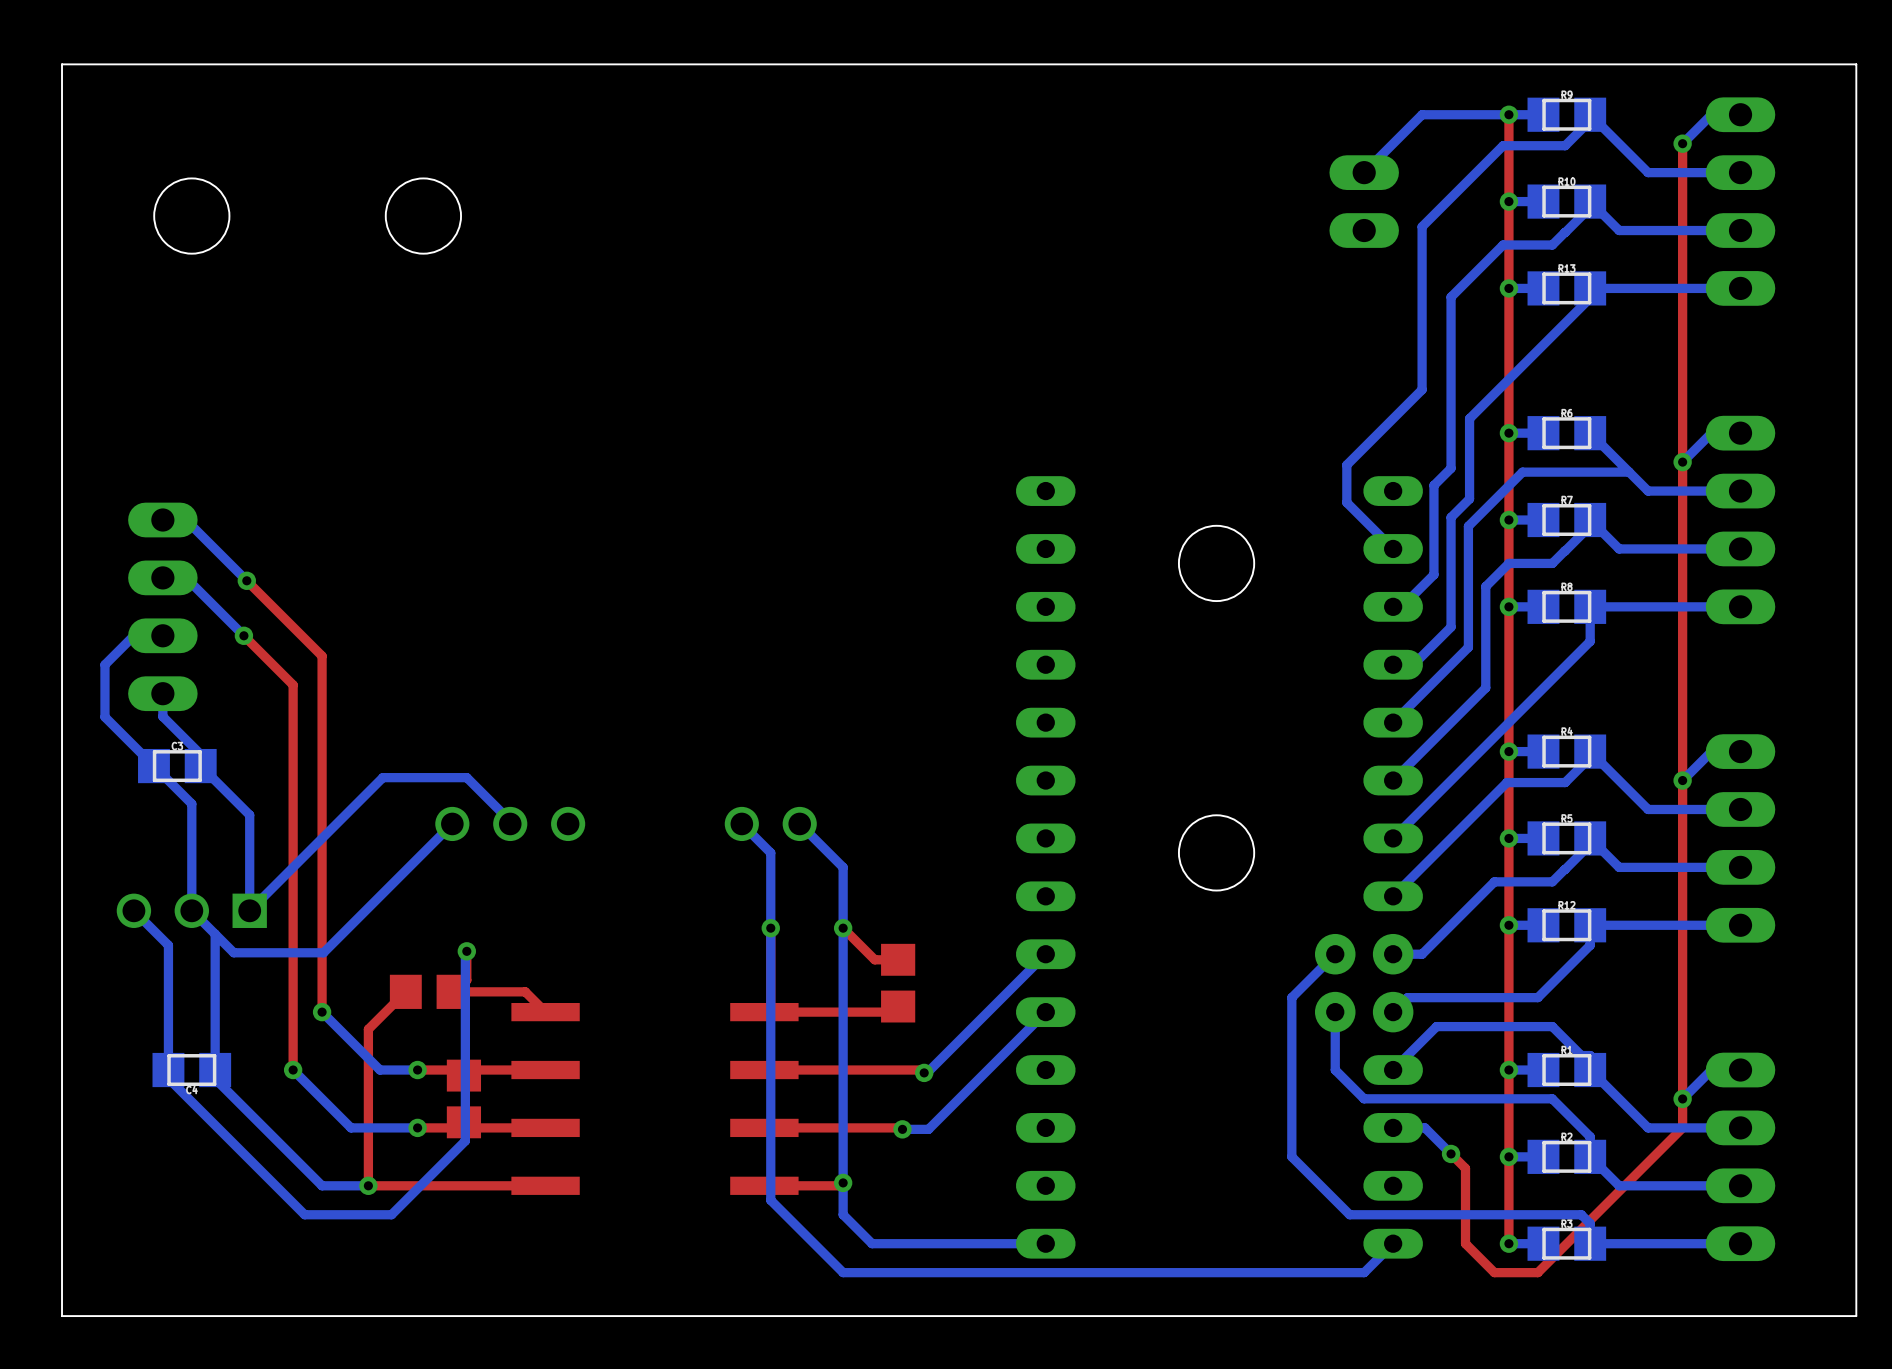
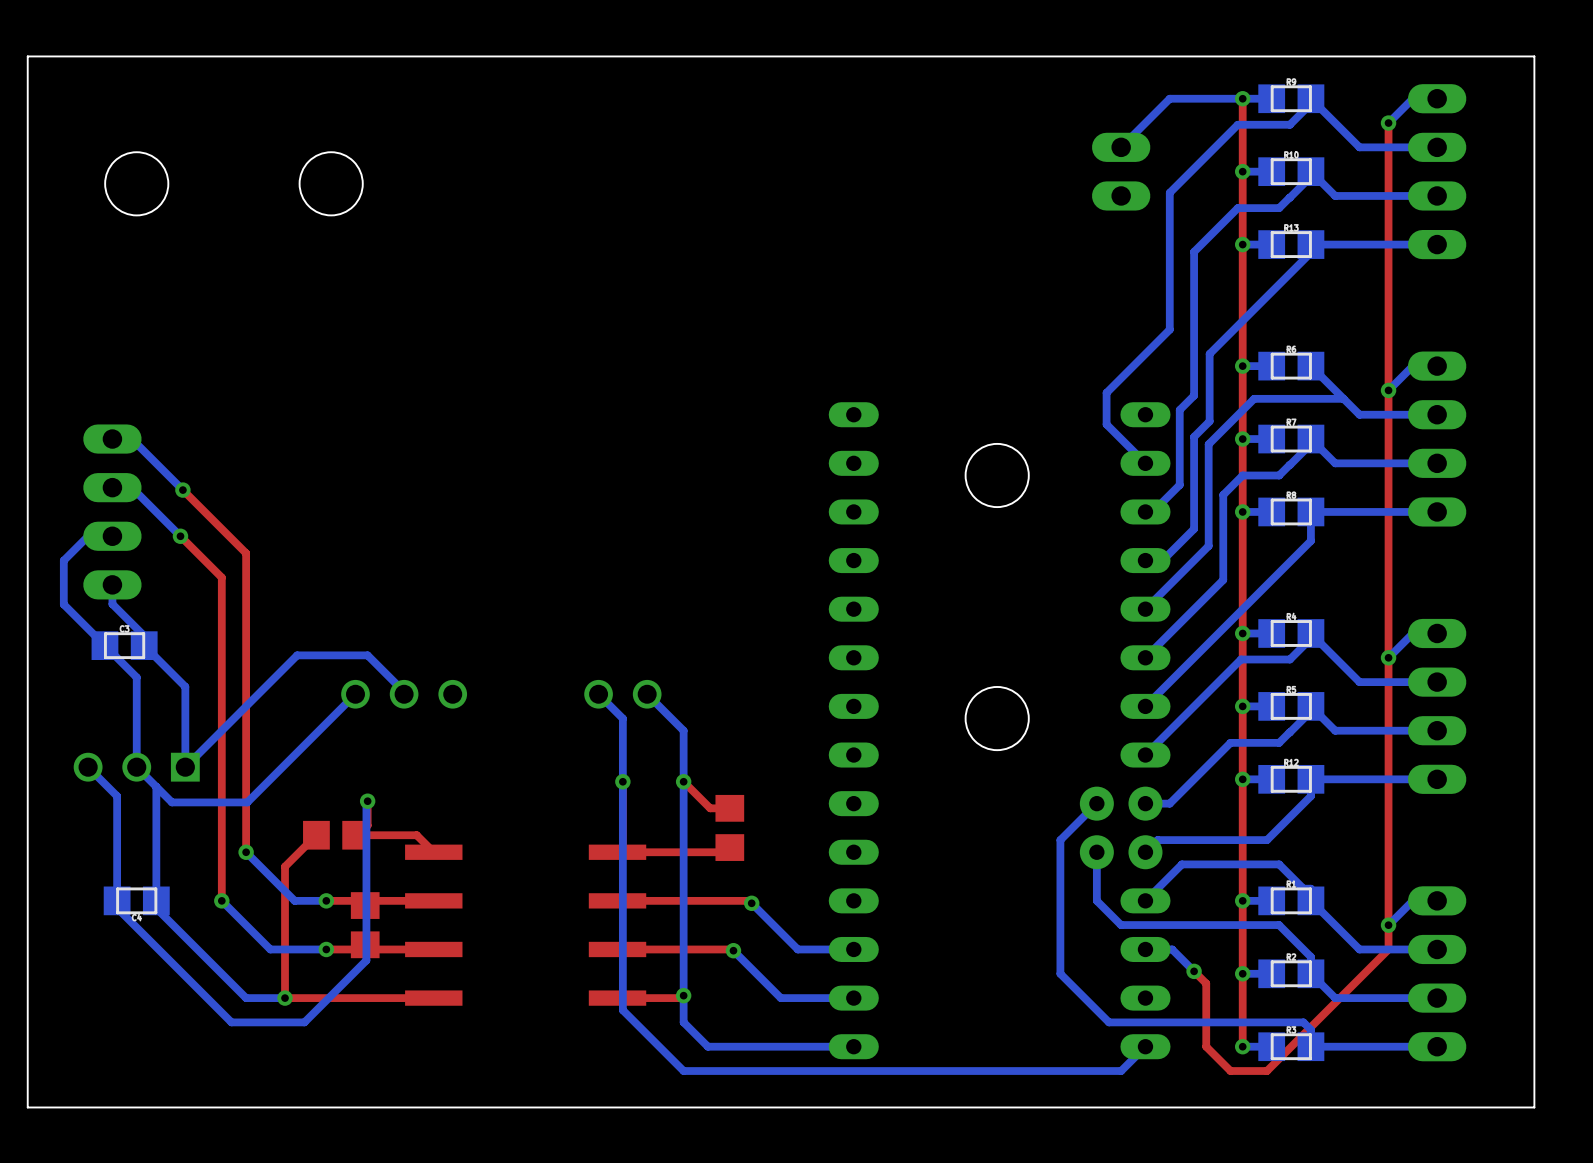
bottom track: (1045, 954) (927, 1072) (924, 1072) -> (853, 949) (797, 949) (751, 903)
bottom track: (1045, 1012) (928, 1129) (902, 1129) -> (853, 998) (780, 998) (733, 950)

